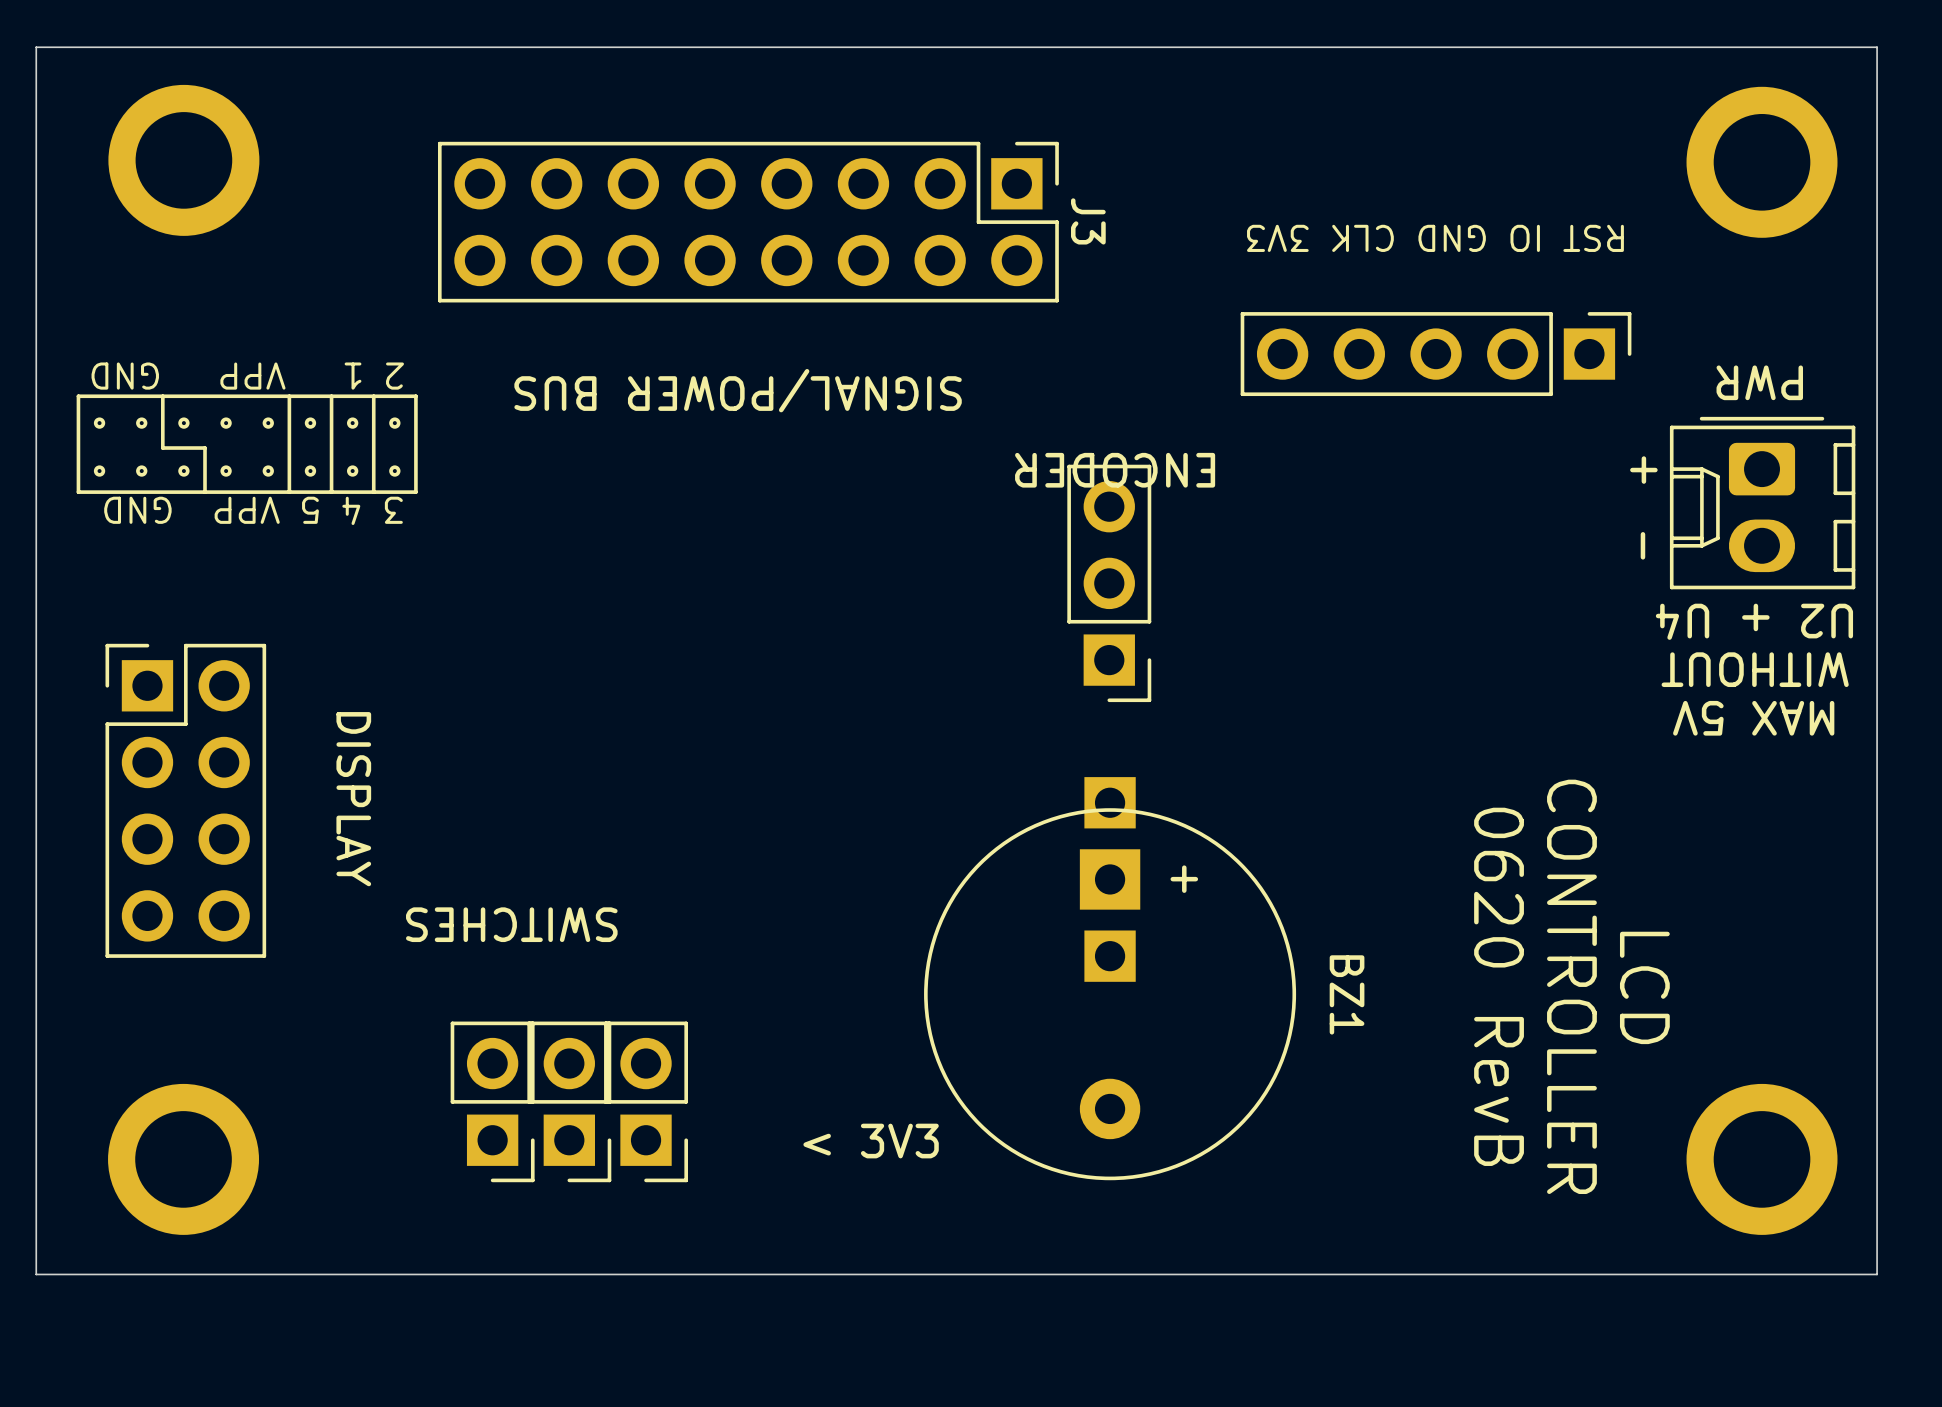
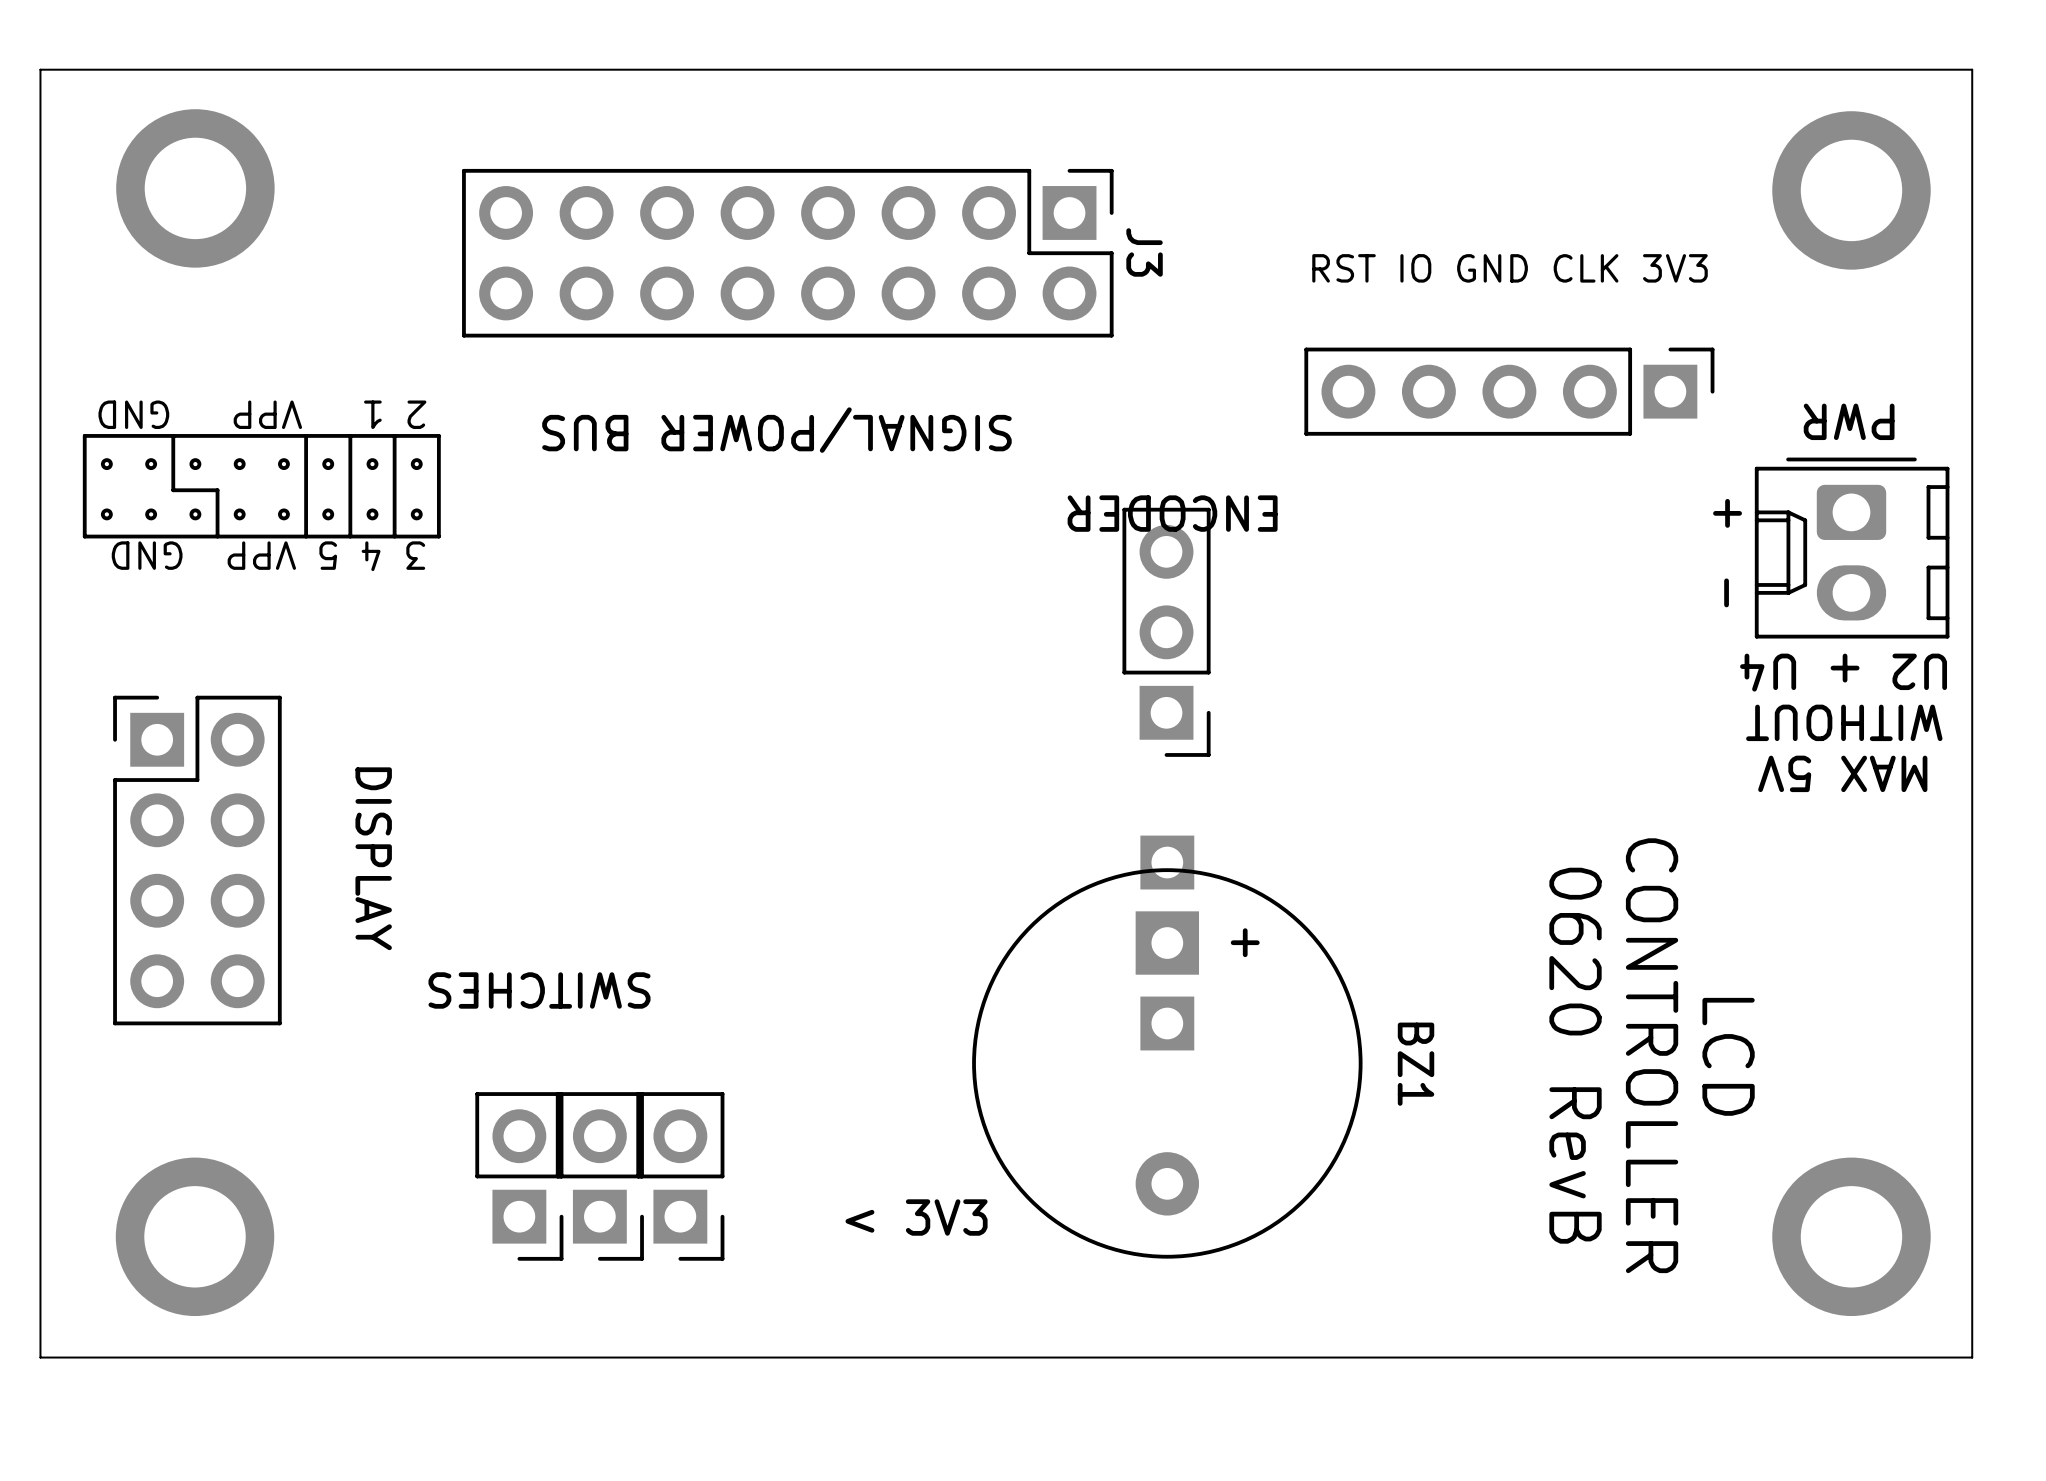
text rotation: 0° (1435, 238) -> 180° (1510, 268)

